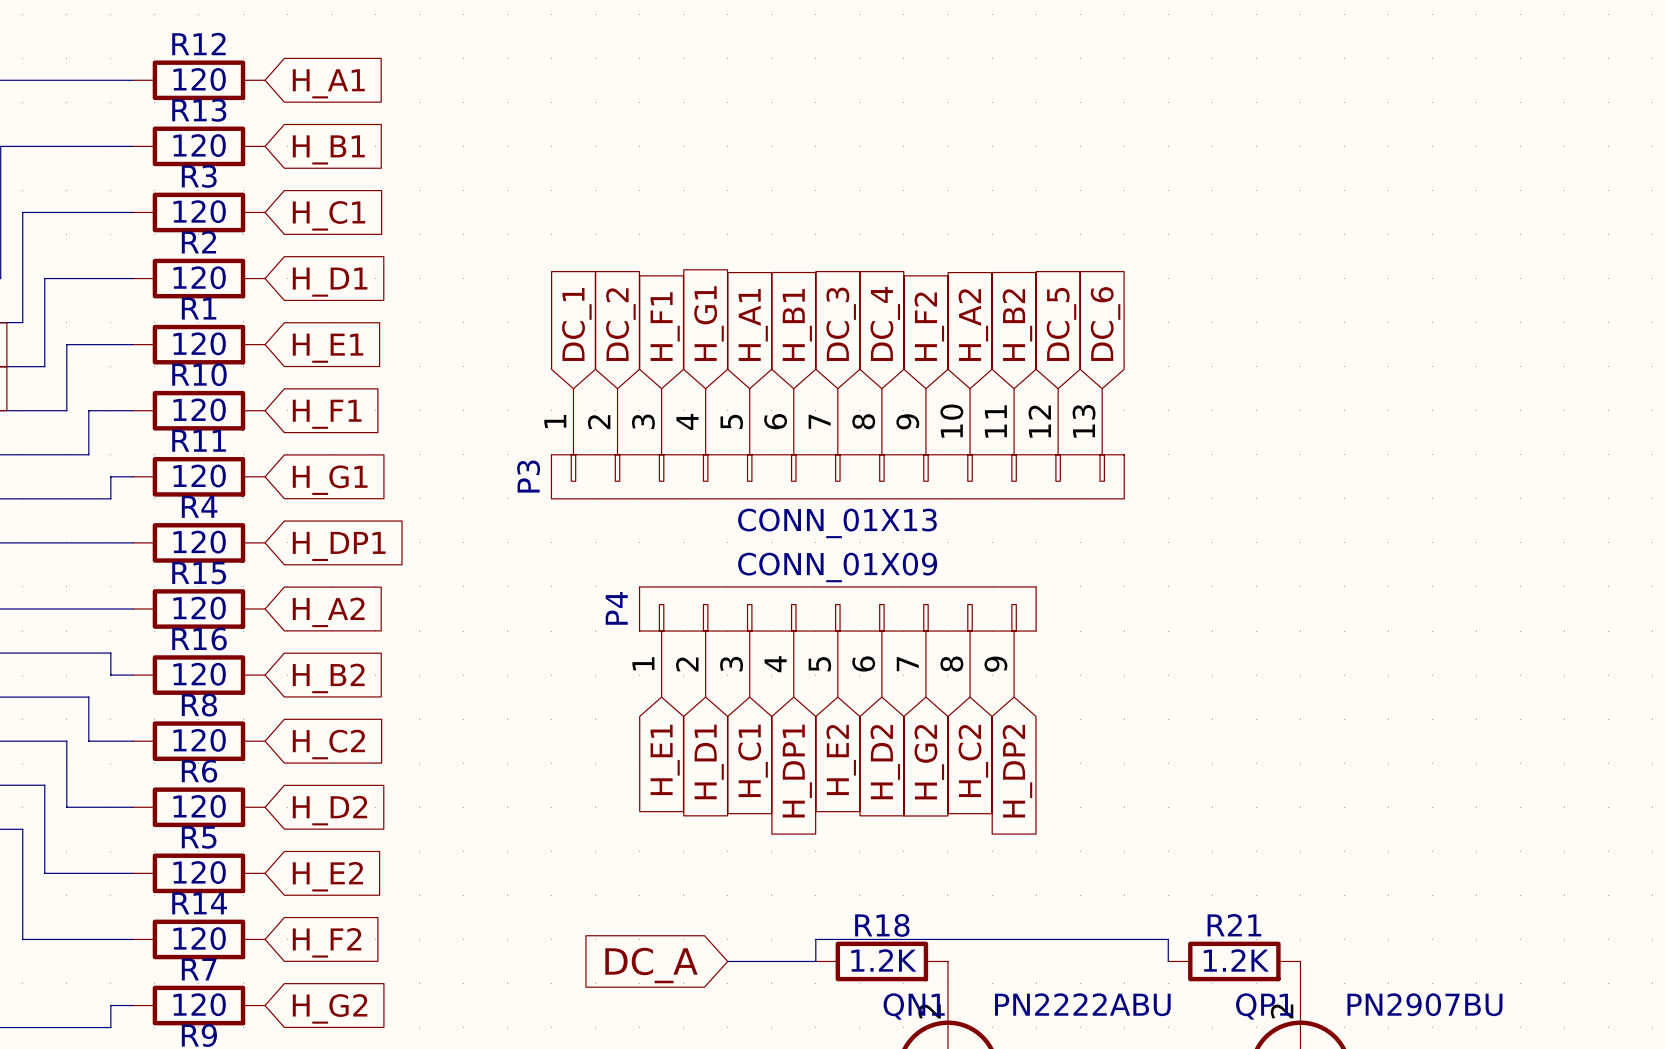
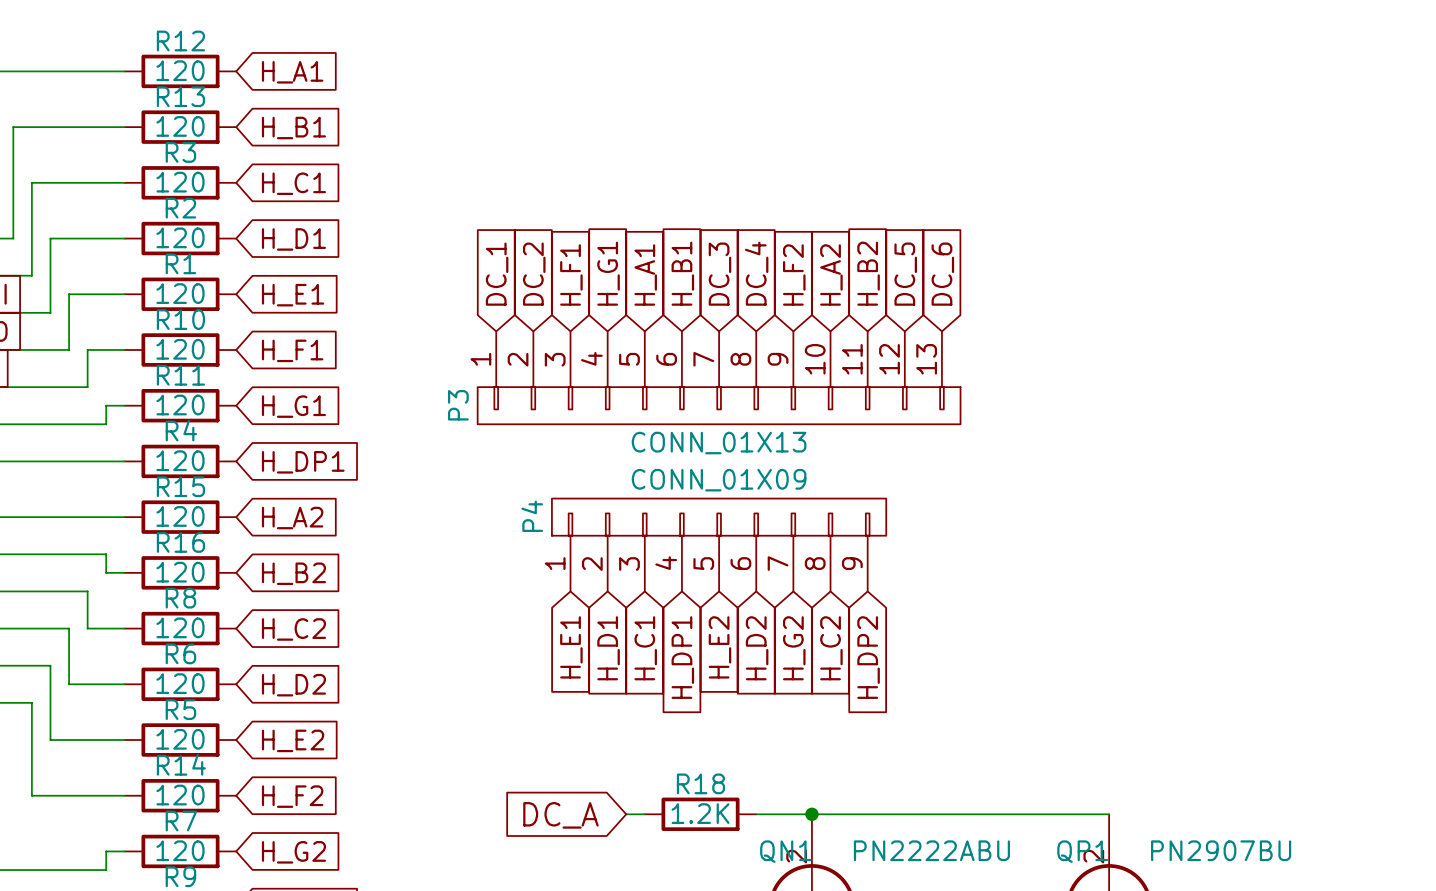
wire: (749, 961) (815, 961) (815, 939) (1168, 939) (1168, 961) -> none
wire: none -> (756, 814) (1109, 814)
R18 position: (881, 961) -> (700, 814)
junction: none -> (811, 814)
R21: 1.2K (1234, 961) -> none

